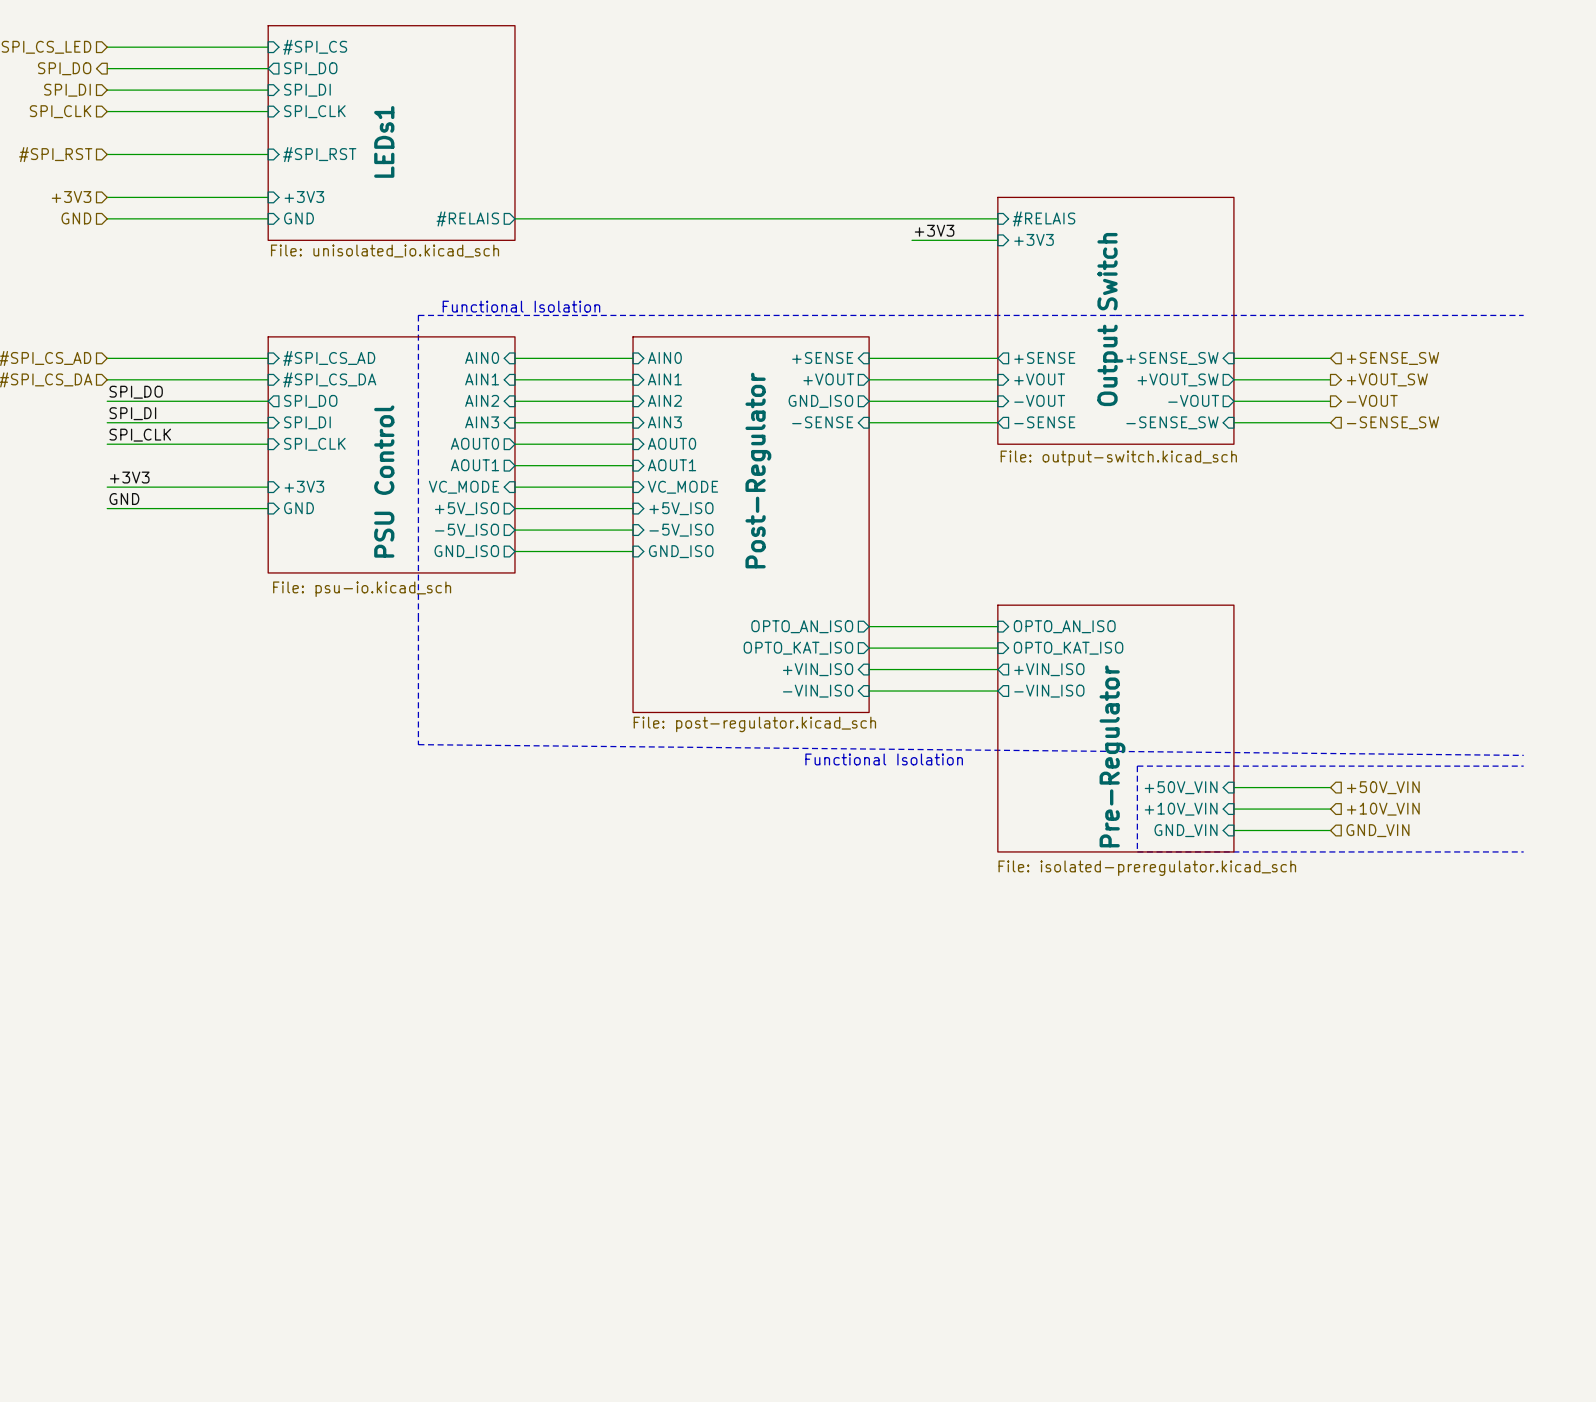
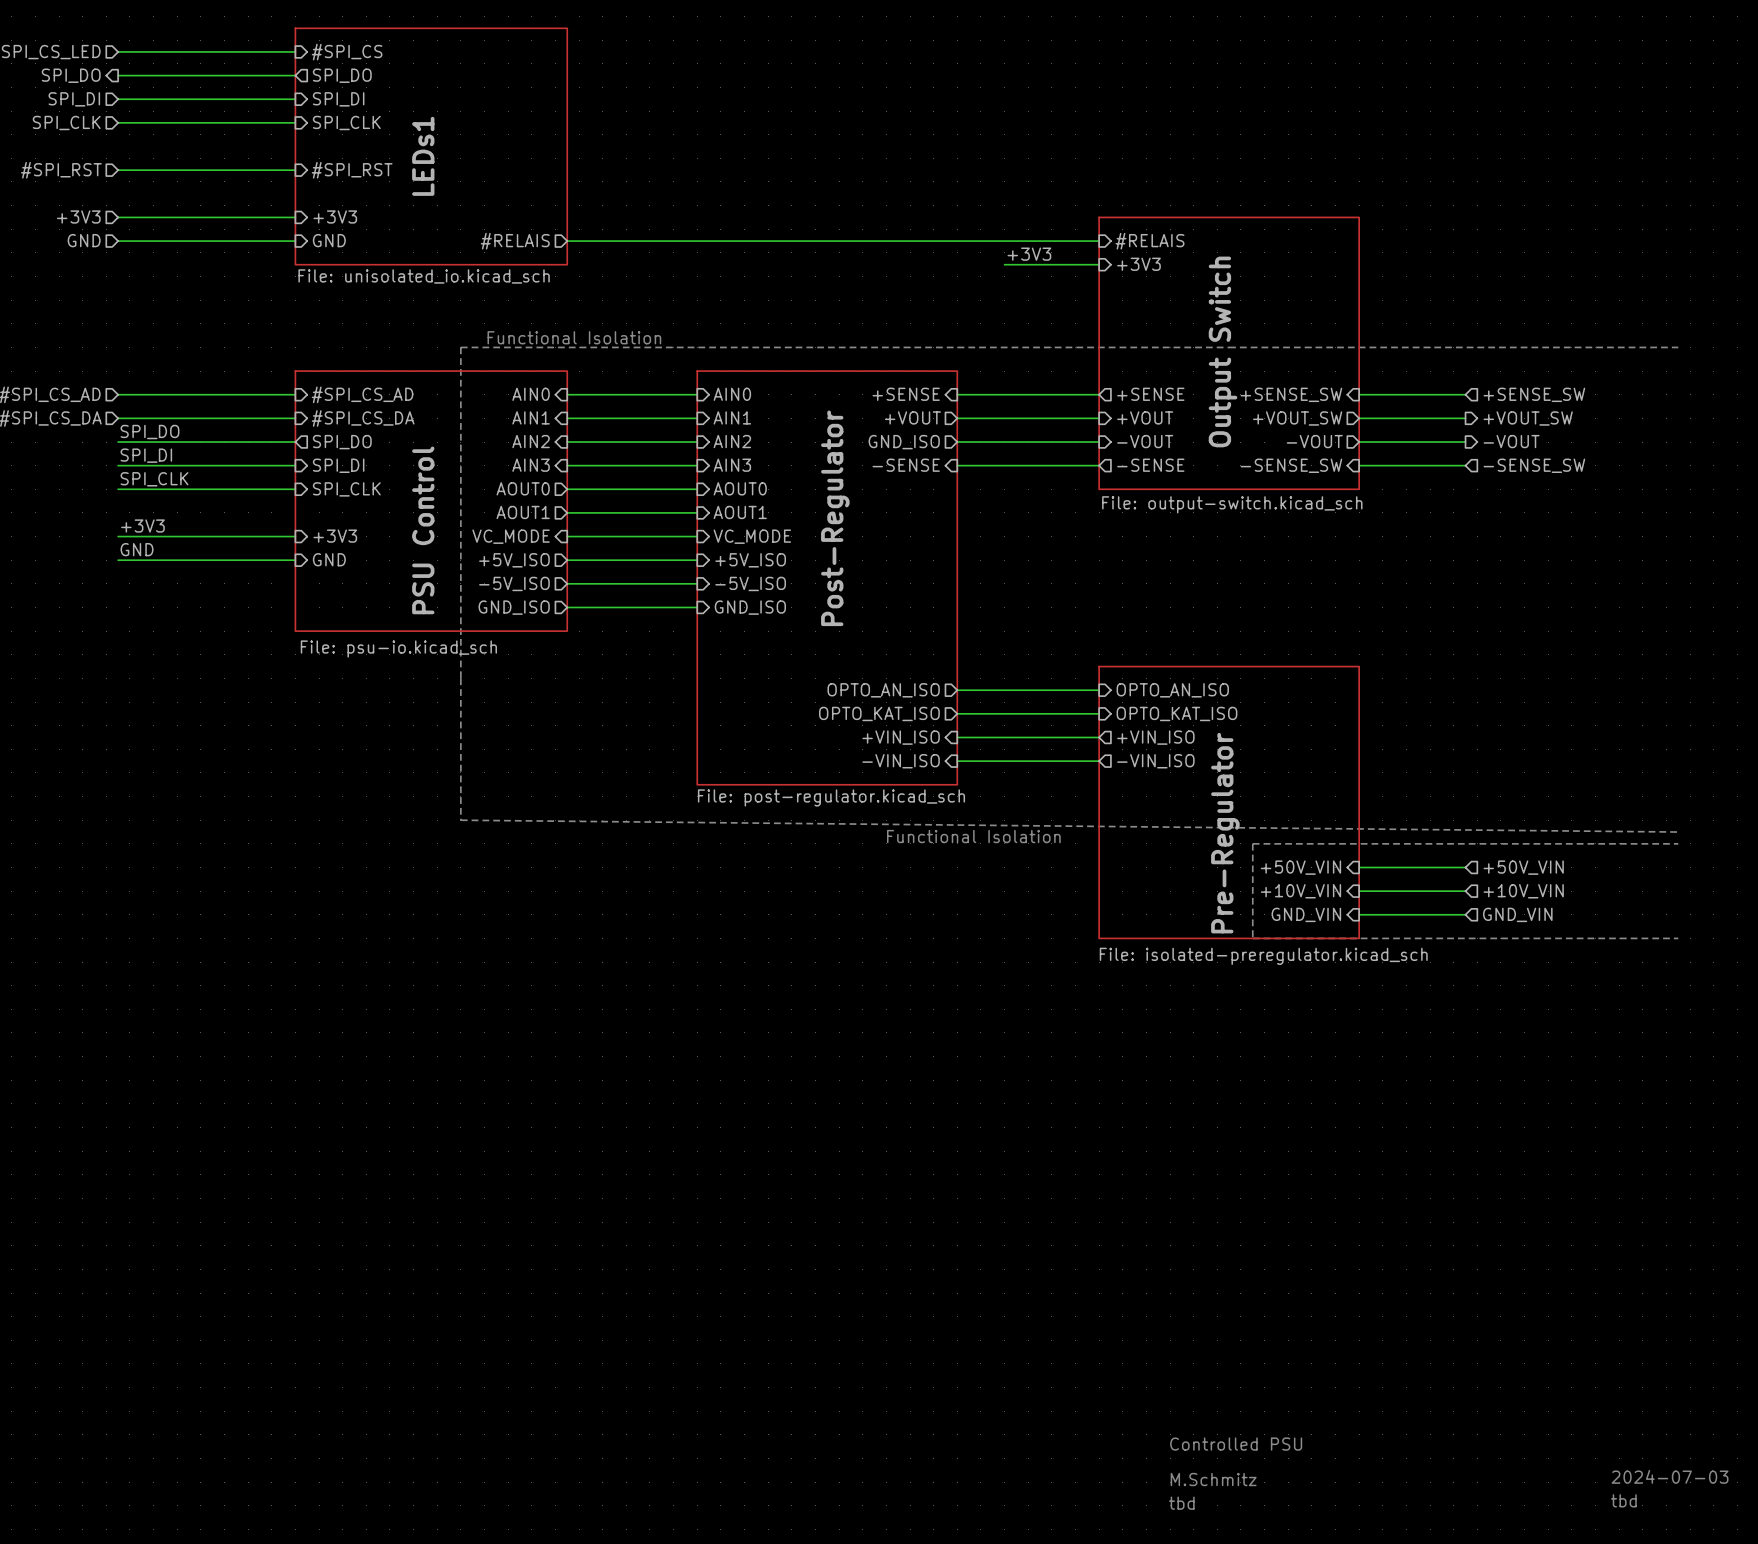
text: none -> Controlled PSU (1236, 1444)
text: none -> 2024-07-03 (1670, 1476)
text: none -> M.Schmitz (1213, 1479)
text: none -> tbd (1623, 1500)
text: none -> tbd (1181, 1503)

